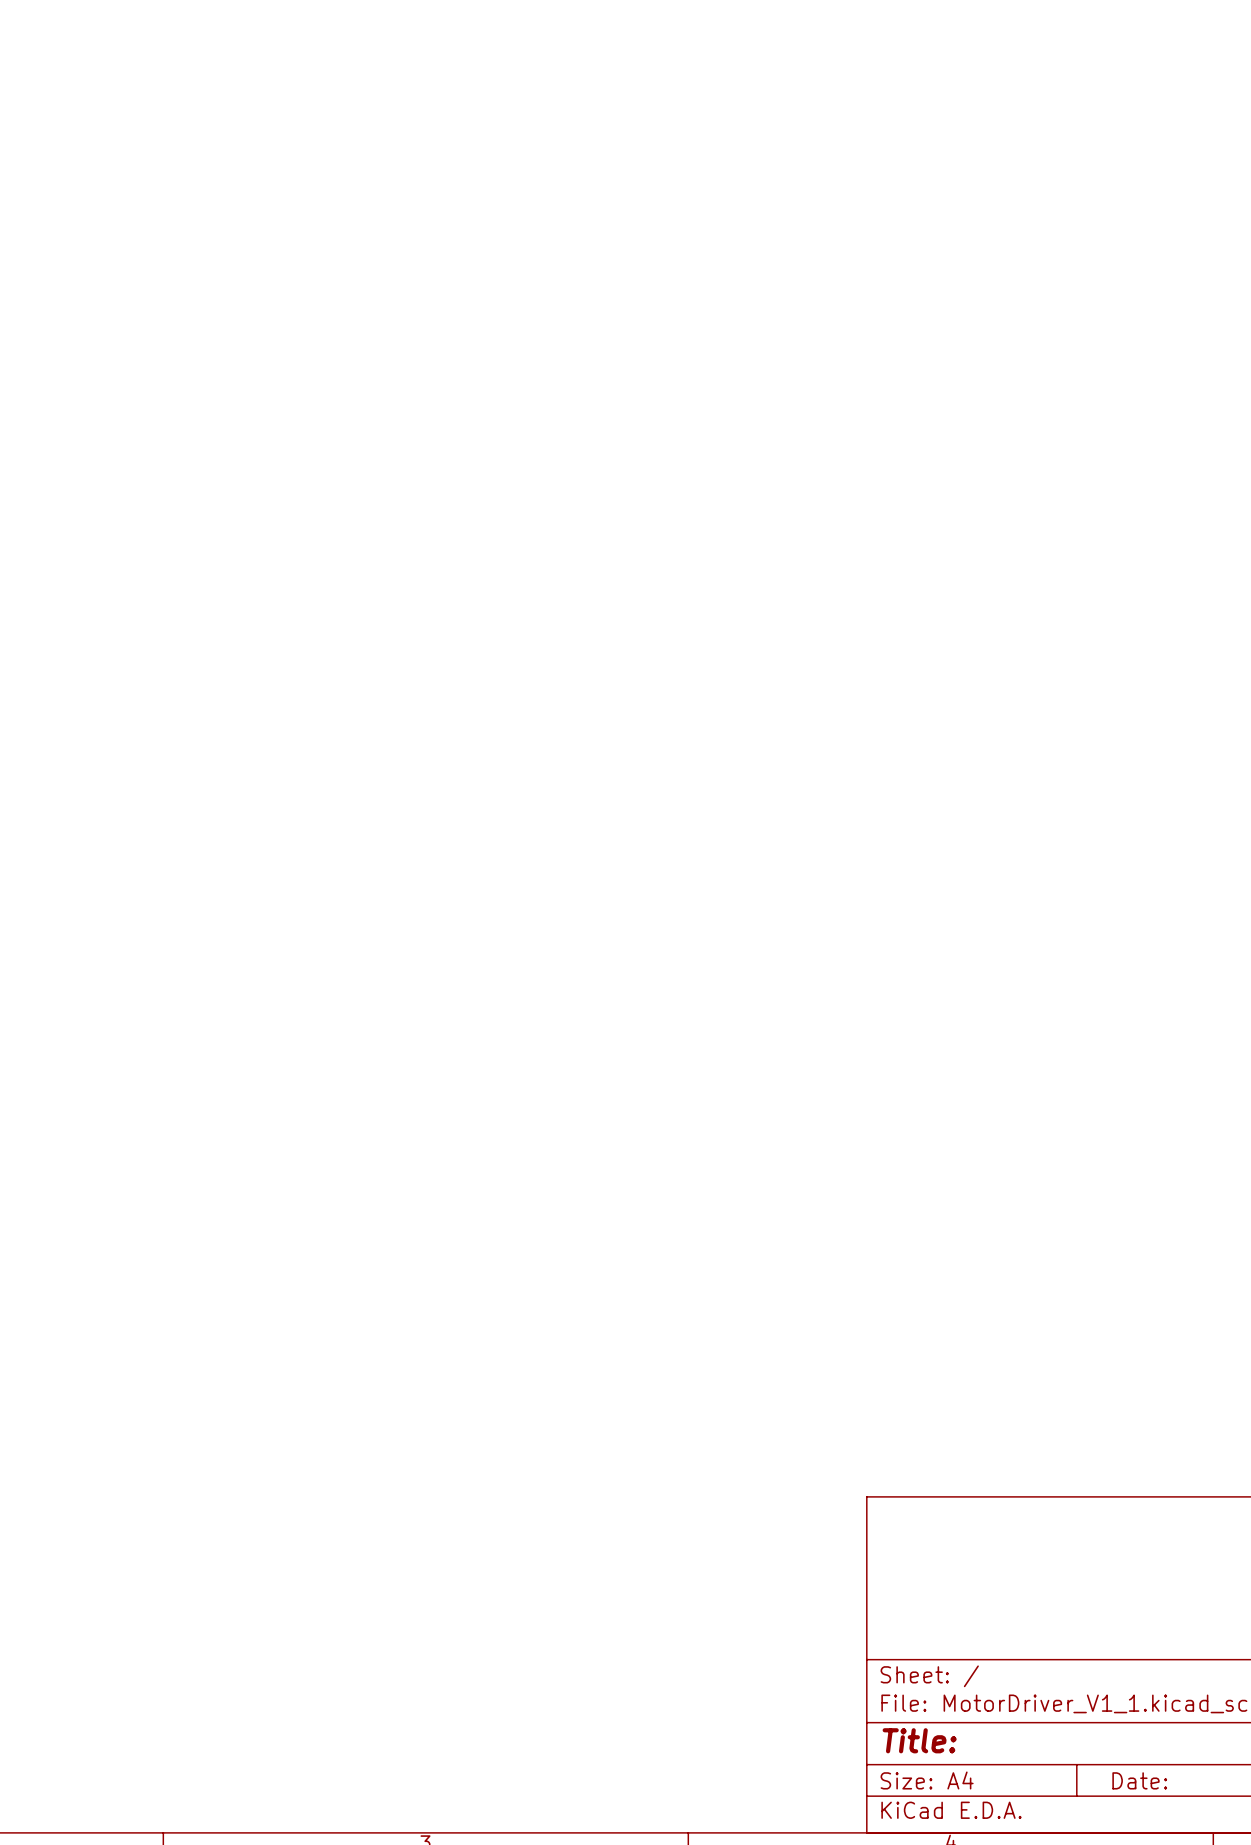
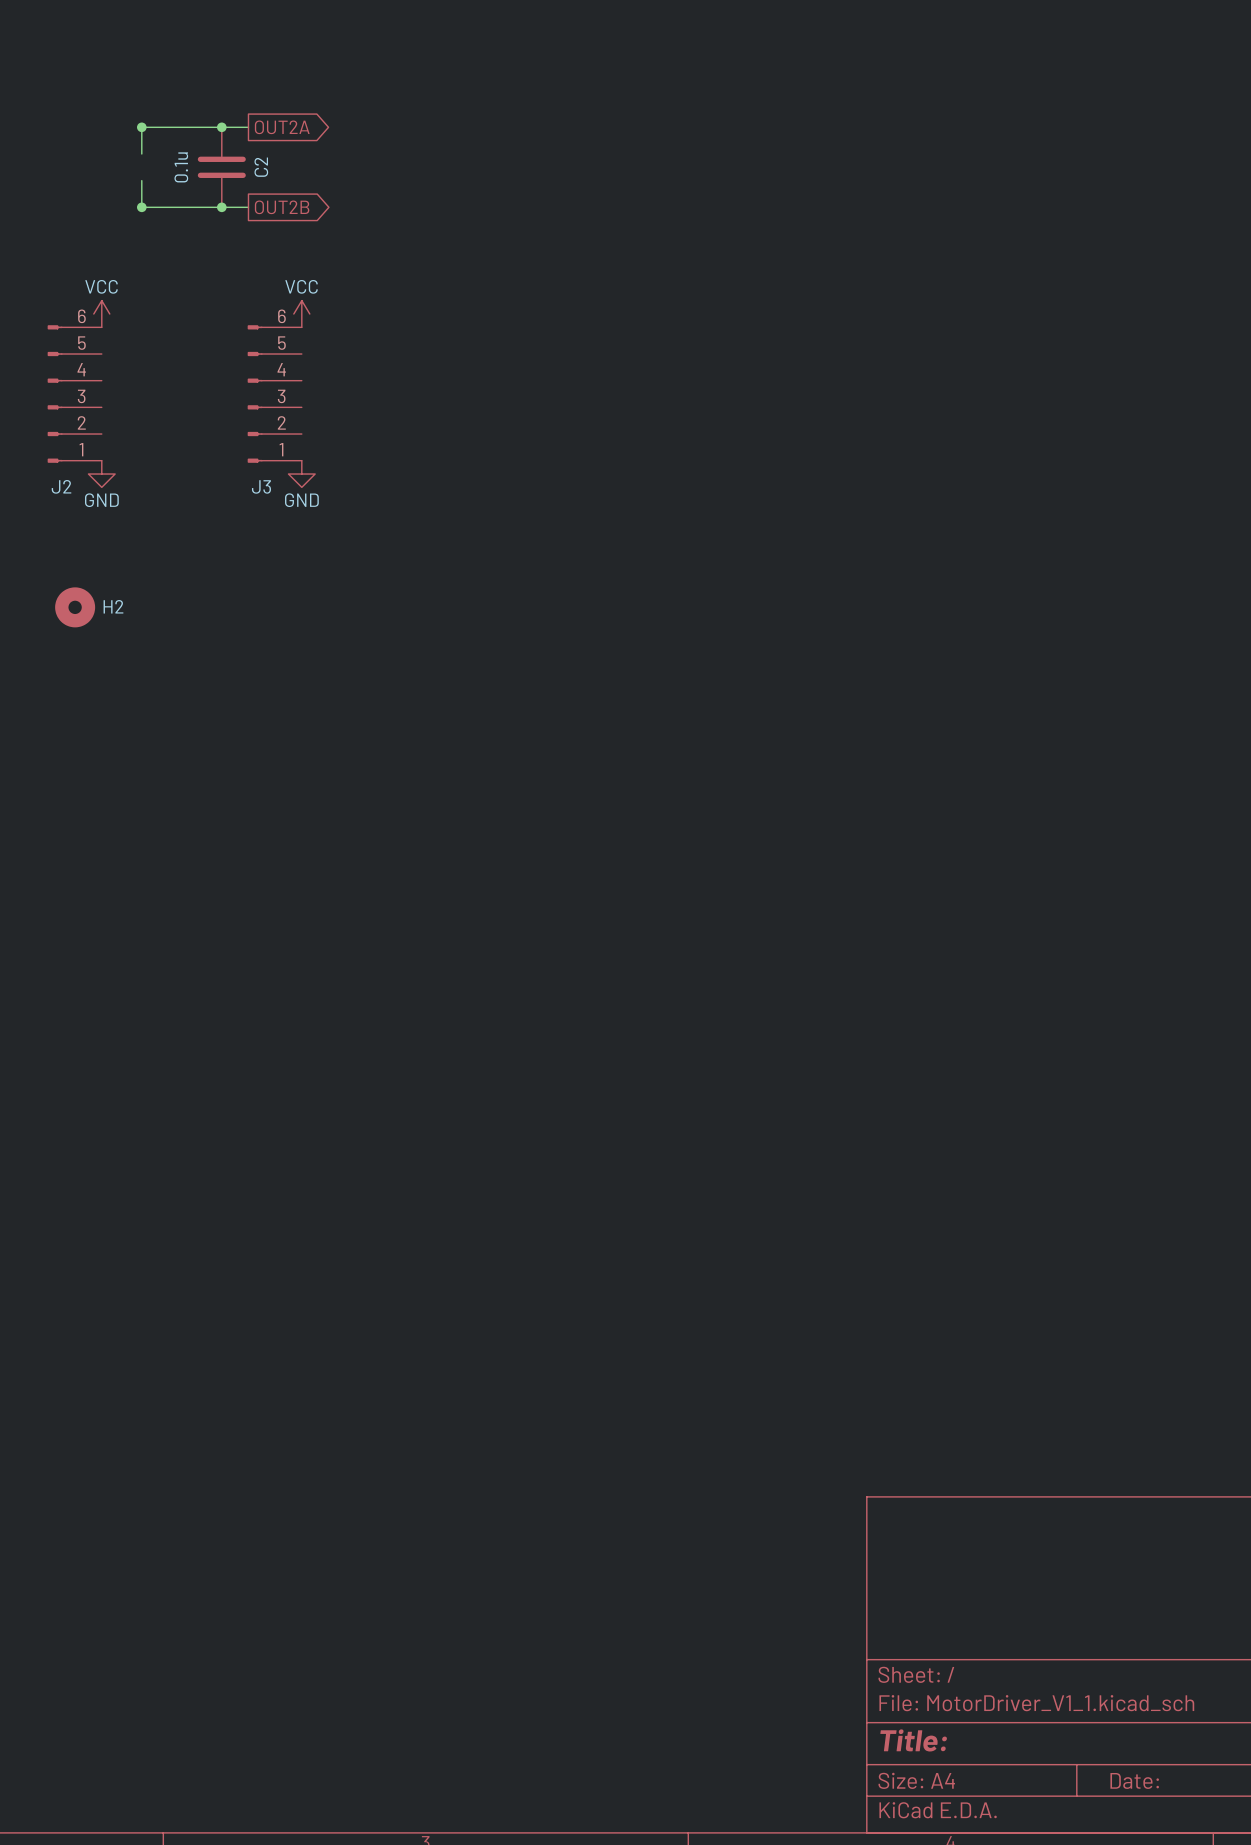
junction: none -> (141, 127)
junction: none -> (221, 127)
wire: none -> (248, 127) (141, 127) (141, 153)
global label: none -> OUT2A (282, 127)
C2: none -> 0.1u (221, 167)
wire: none -> (141, 180) (141, 207) (248, 207)
junction: none -> (141, 207)
junction: none -> (221, 207)
global label: none -> OUT2B (282, 207)
power symbol: none -> VCC (101, 314)
power symbol: none -> VCC (301, 314)
J2: none -> (74, 394)
J3: none -> (274, 394)
power symbol: none -> GND (101, 474)
power symbol: none -> GND (301, 474)
H2: none -> (75, 607)

